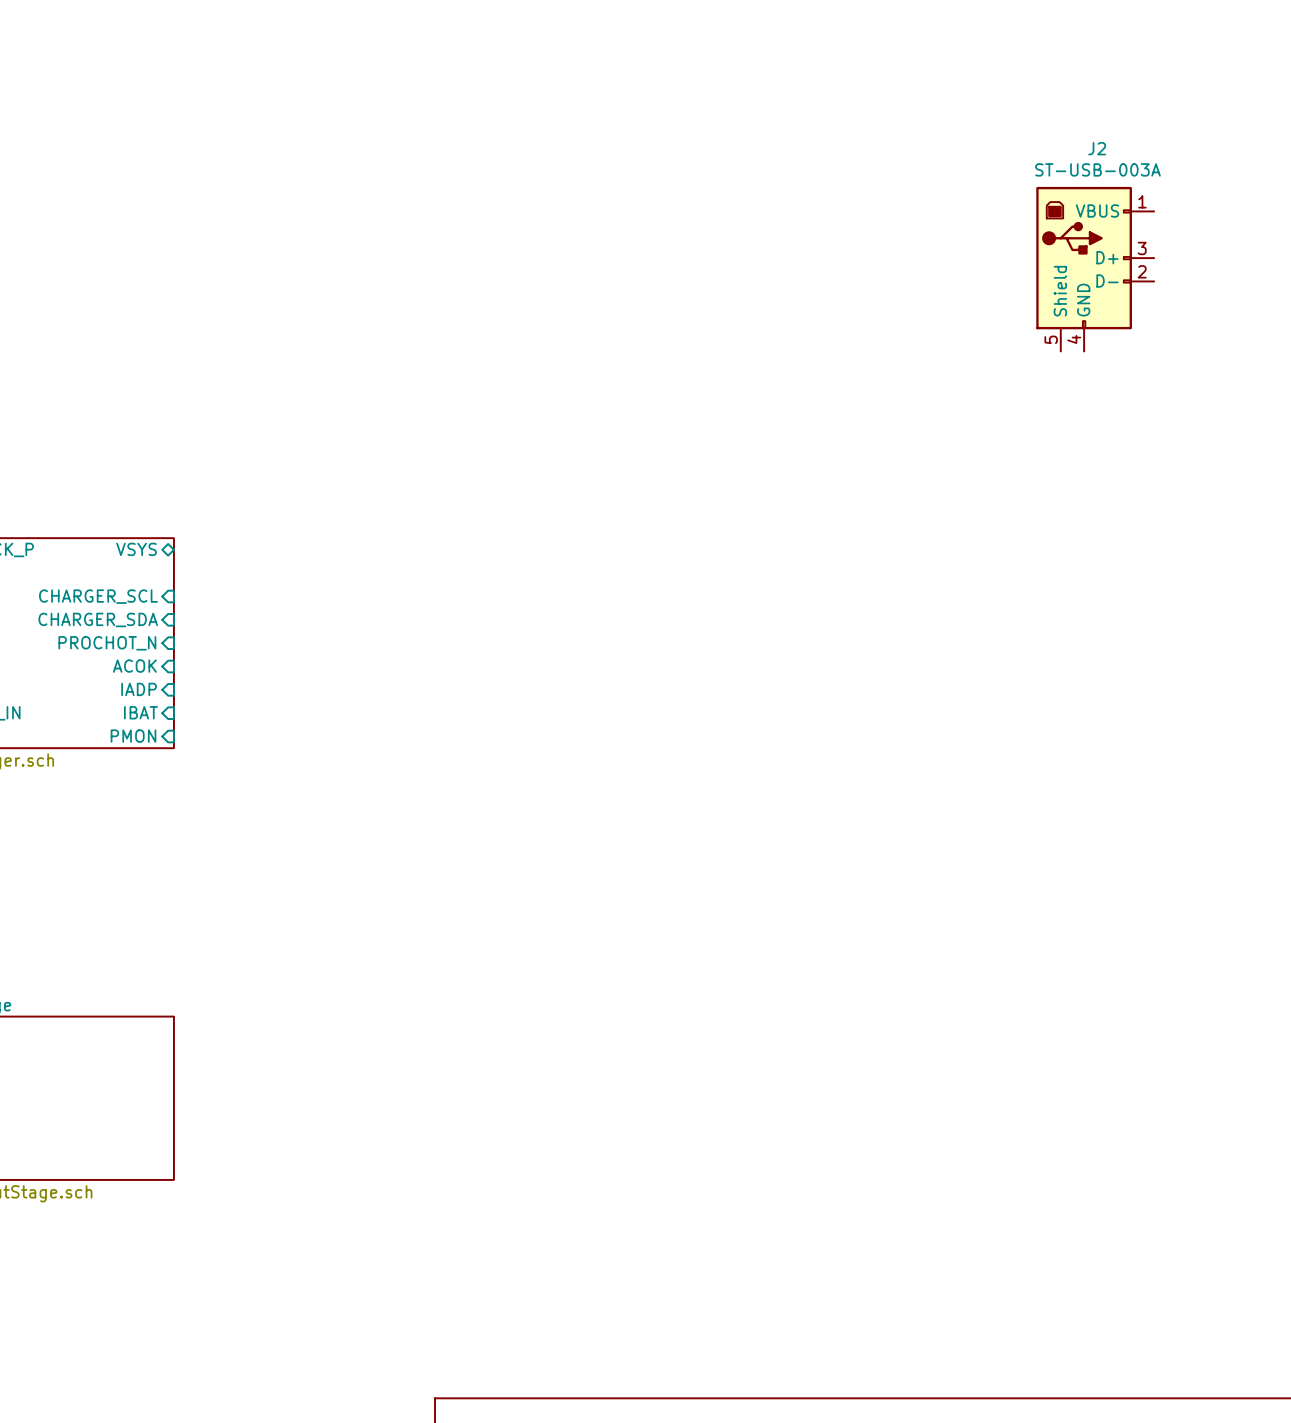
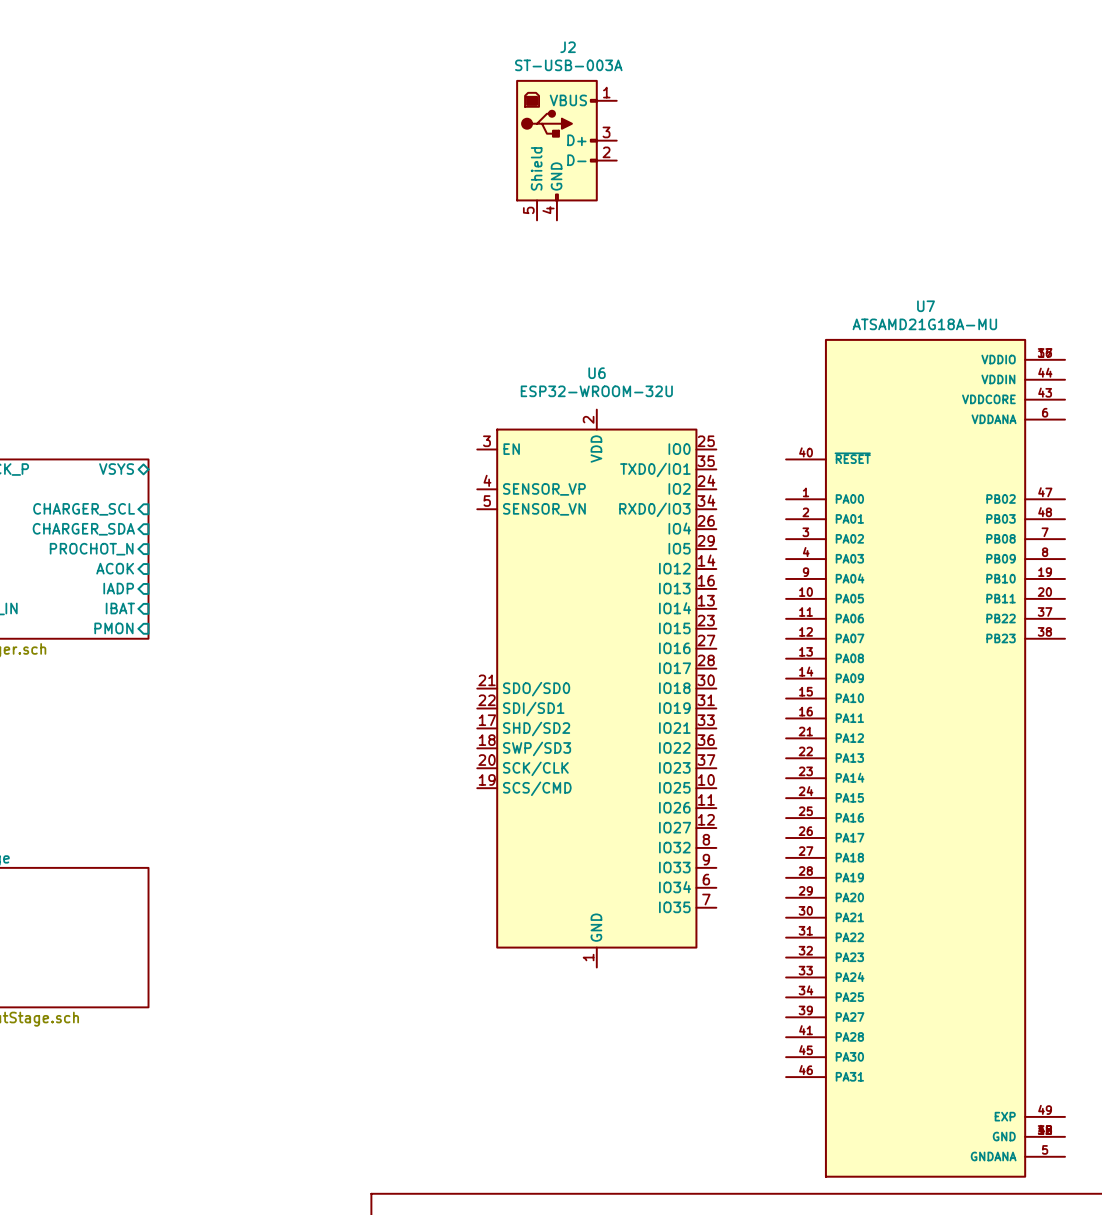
J2 position: (1095, 269) -> (566, 150)
U6: none -> ESP32-WROOM-32U (596, 688)
U7: none -> ATSAMD21G18A-MU (925, 758)

